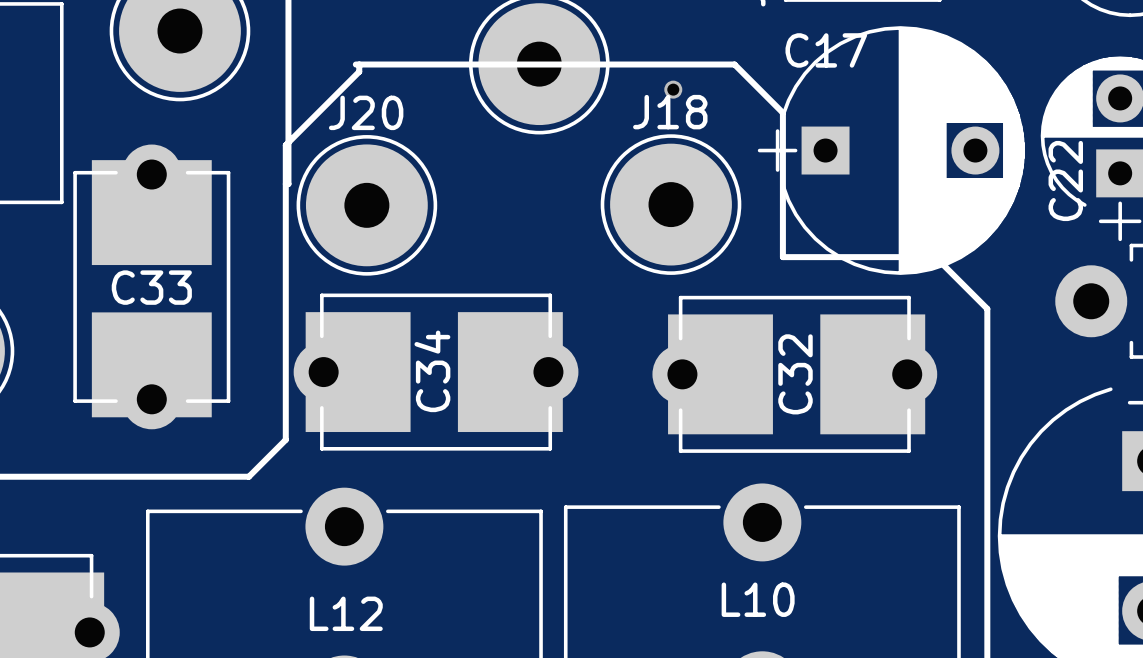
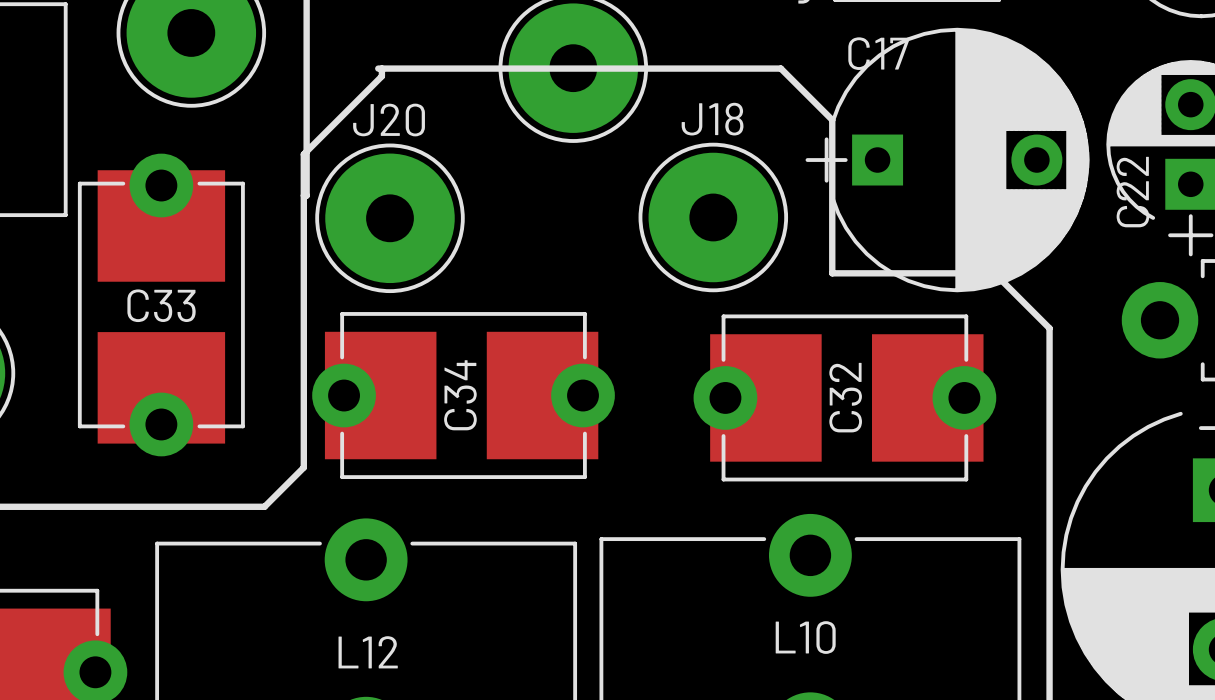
via: (673, 89) -> none

